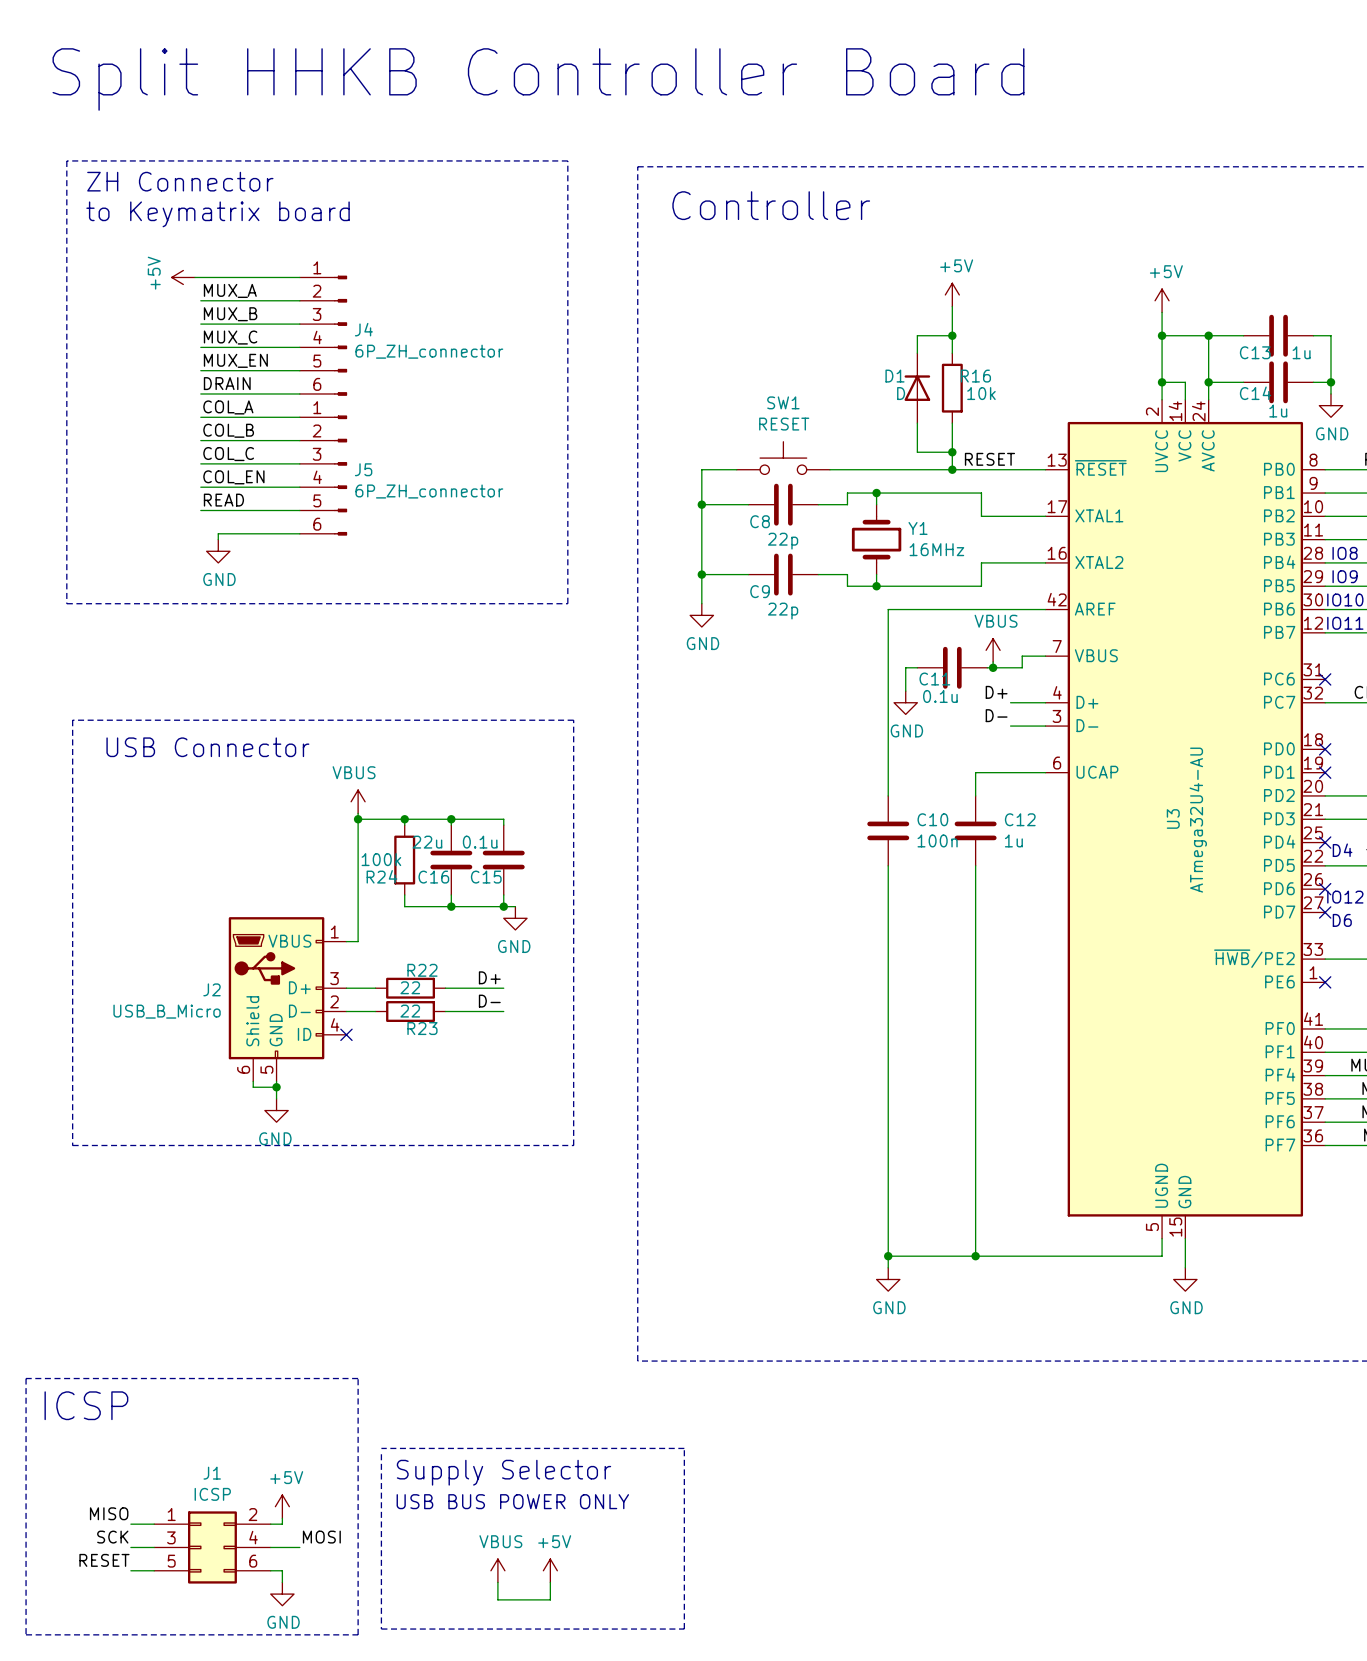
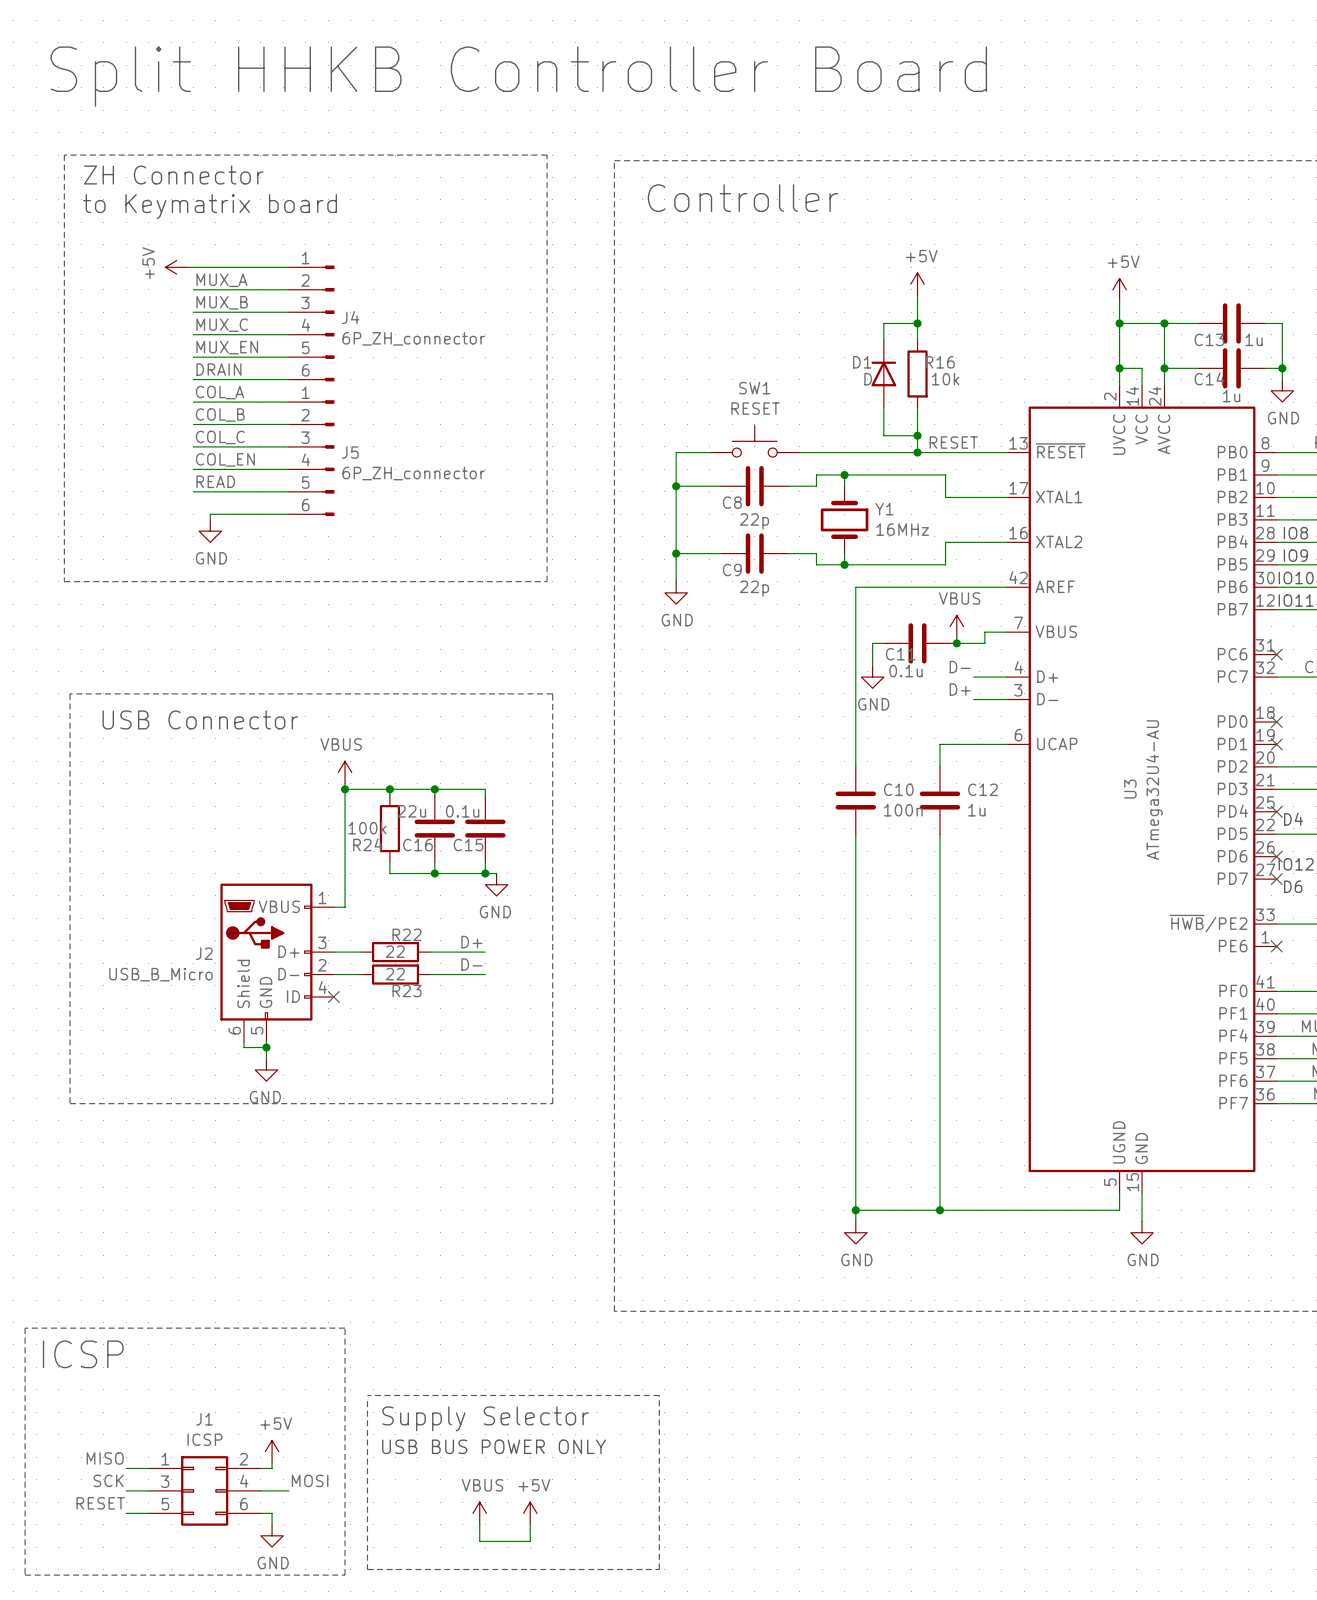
label: D+ (996, 692) -> D- (960, 667)
label: D- (996, 715) -> D+ (960, 689)

